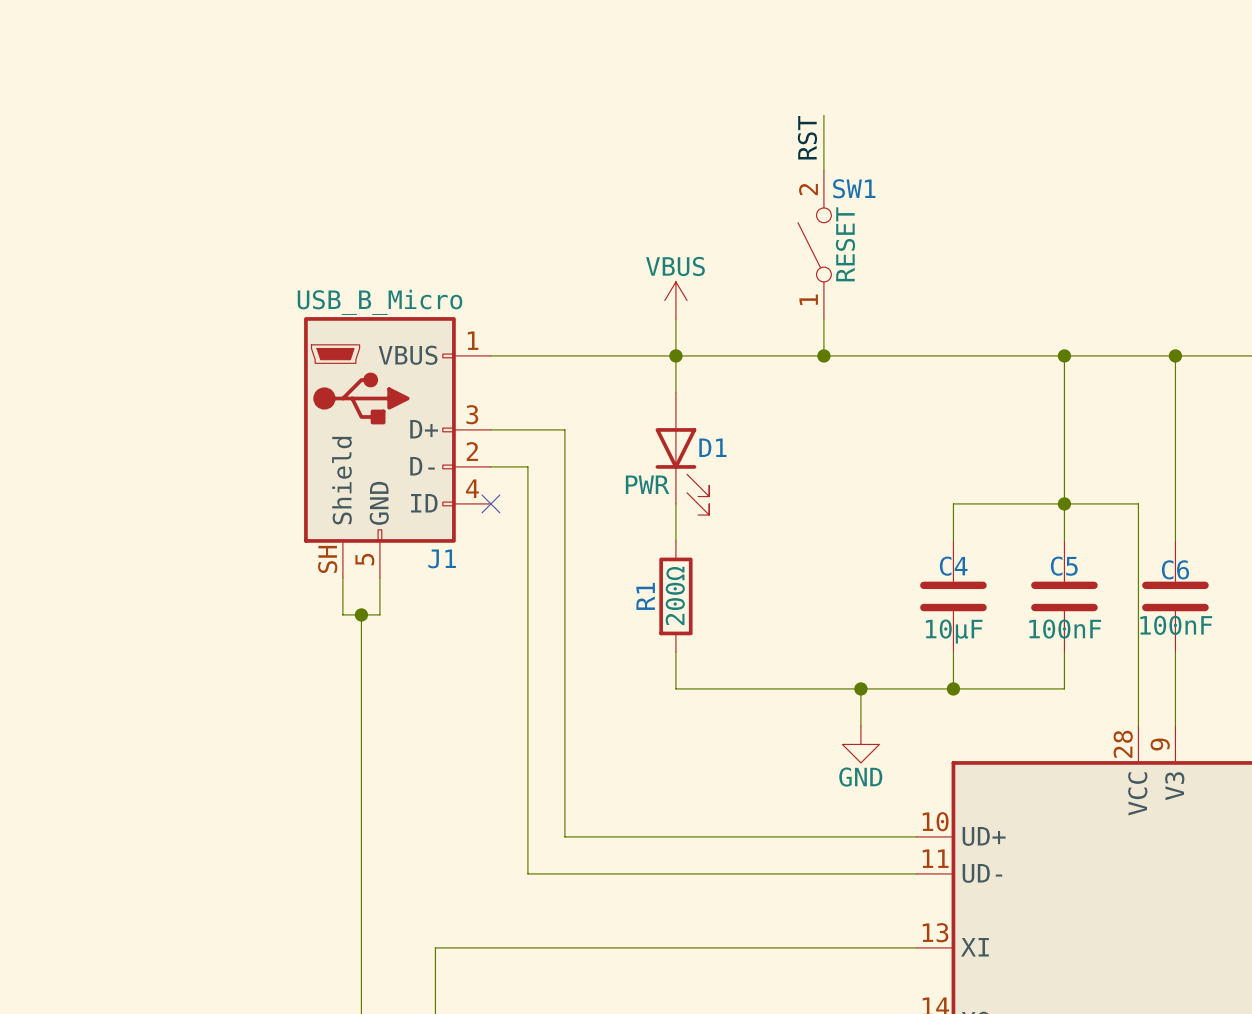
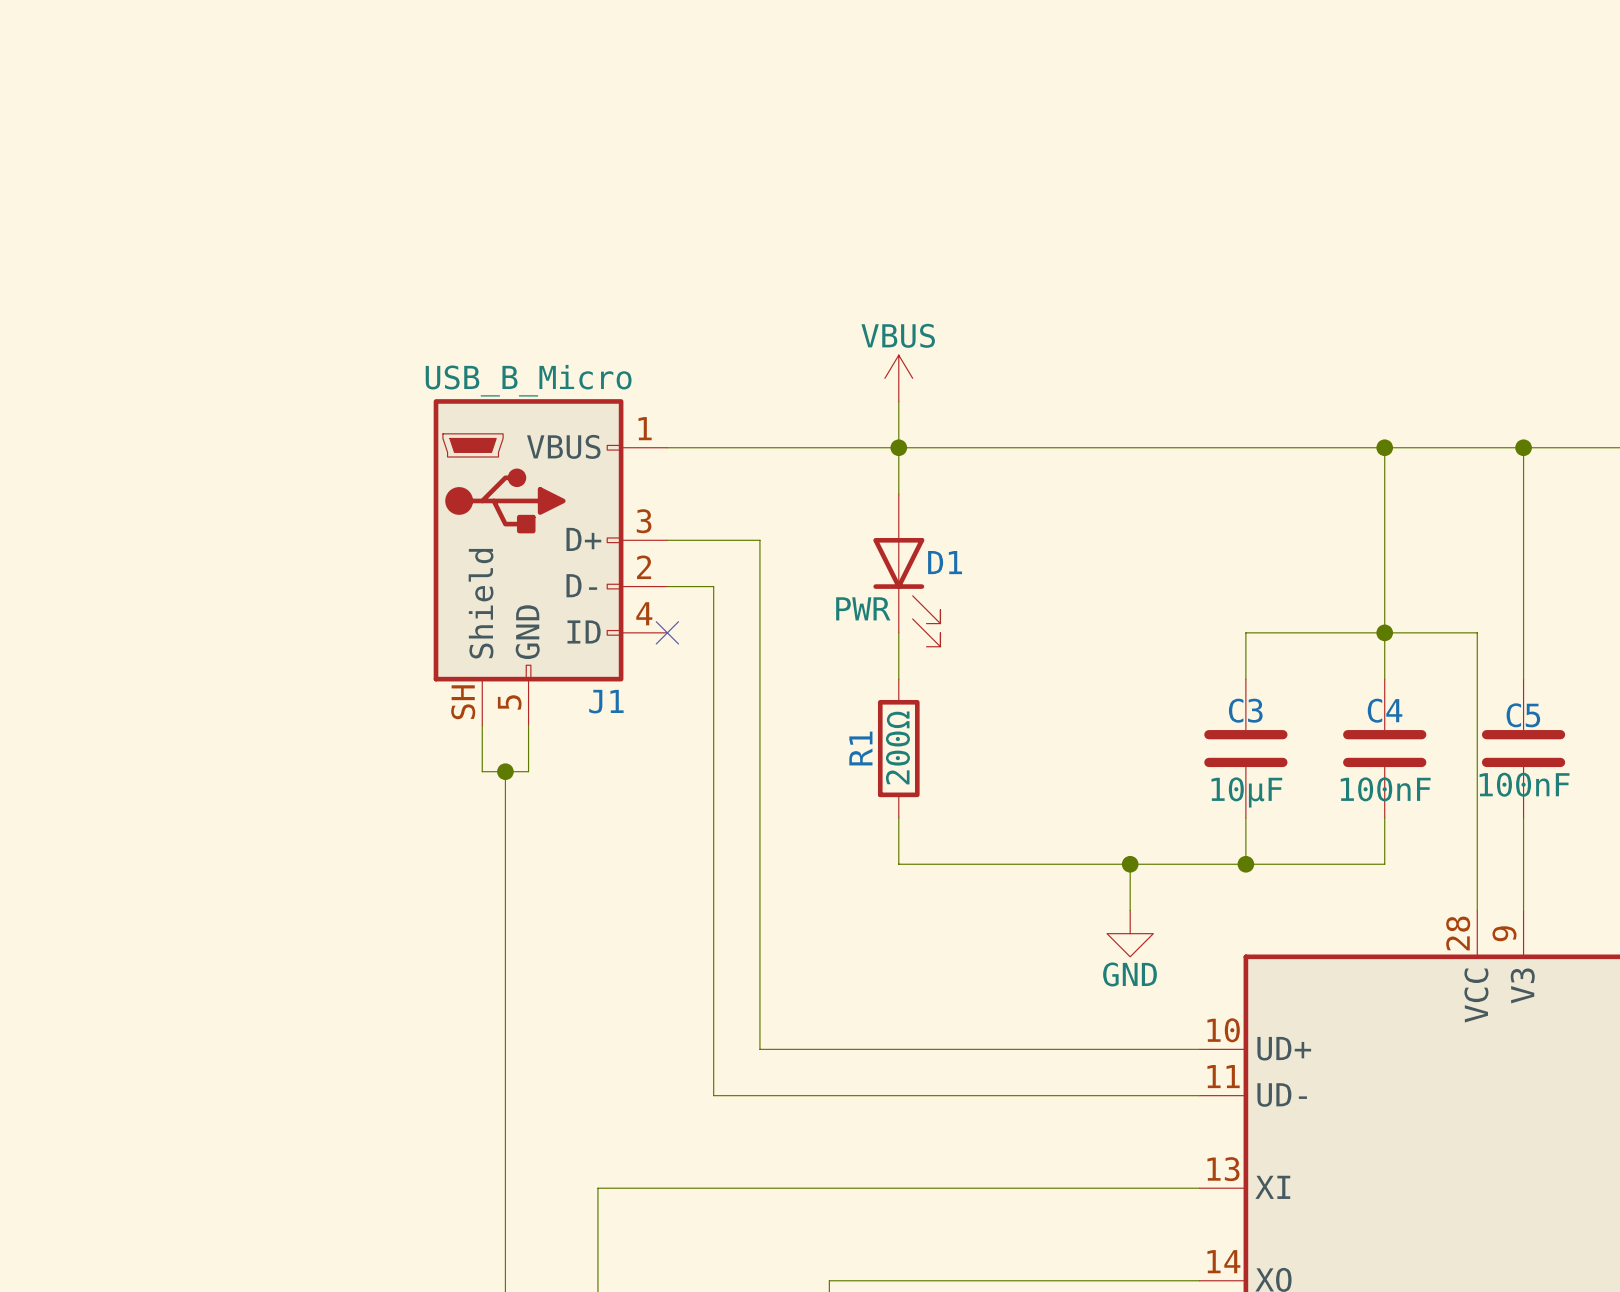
wire: (823, 115) (823, 170) -> none
label: RST (807, 137) -> none
SW1: RESET (814, 244) -> none
wire: (823, 318) (823, 355) -> none
junction: (823, 355) -> none
C4 name: C4 (953, 566) -> C3 (1245, 710)
C5 name: C5 (1064, 566) -> C4 (1385, 710)
C6 name: C6 (1175, 569) -> C5 (1523, 715)

